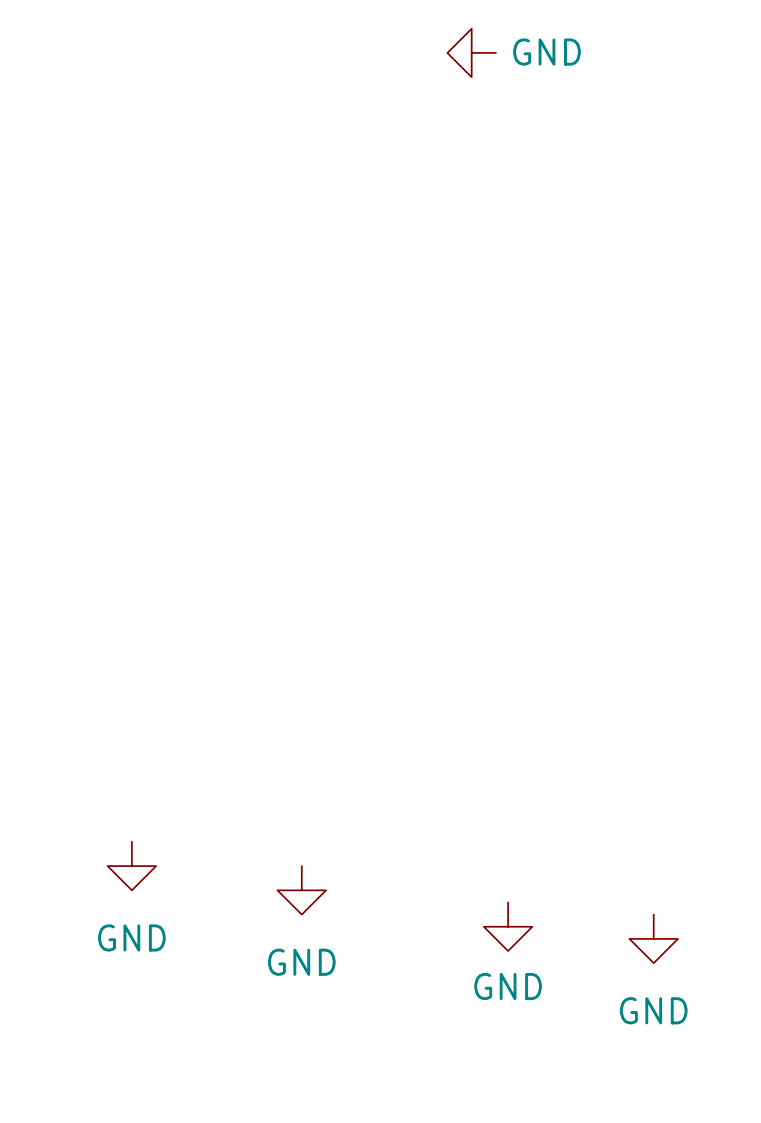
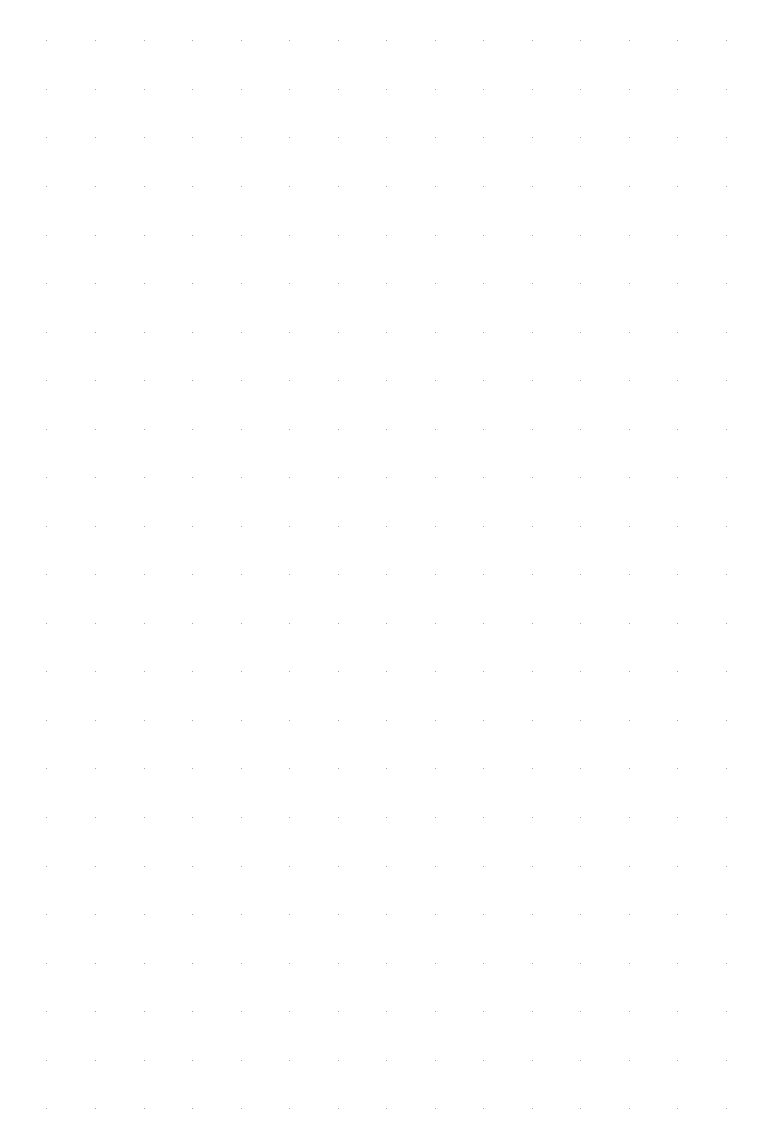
power symbol: GND (471, 52) -> none
power symbol: GND (131, 866) -> none
power symbol: GND (301, 890) -> none
power symbol: GND (508, 926) -> none
power symbol: GND (653, 938) -> none

